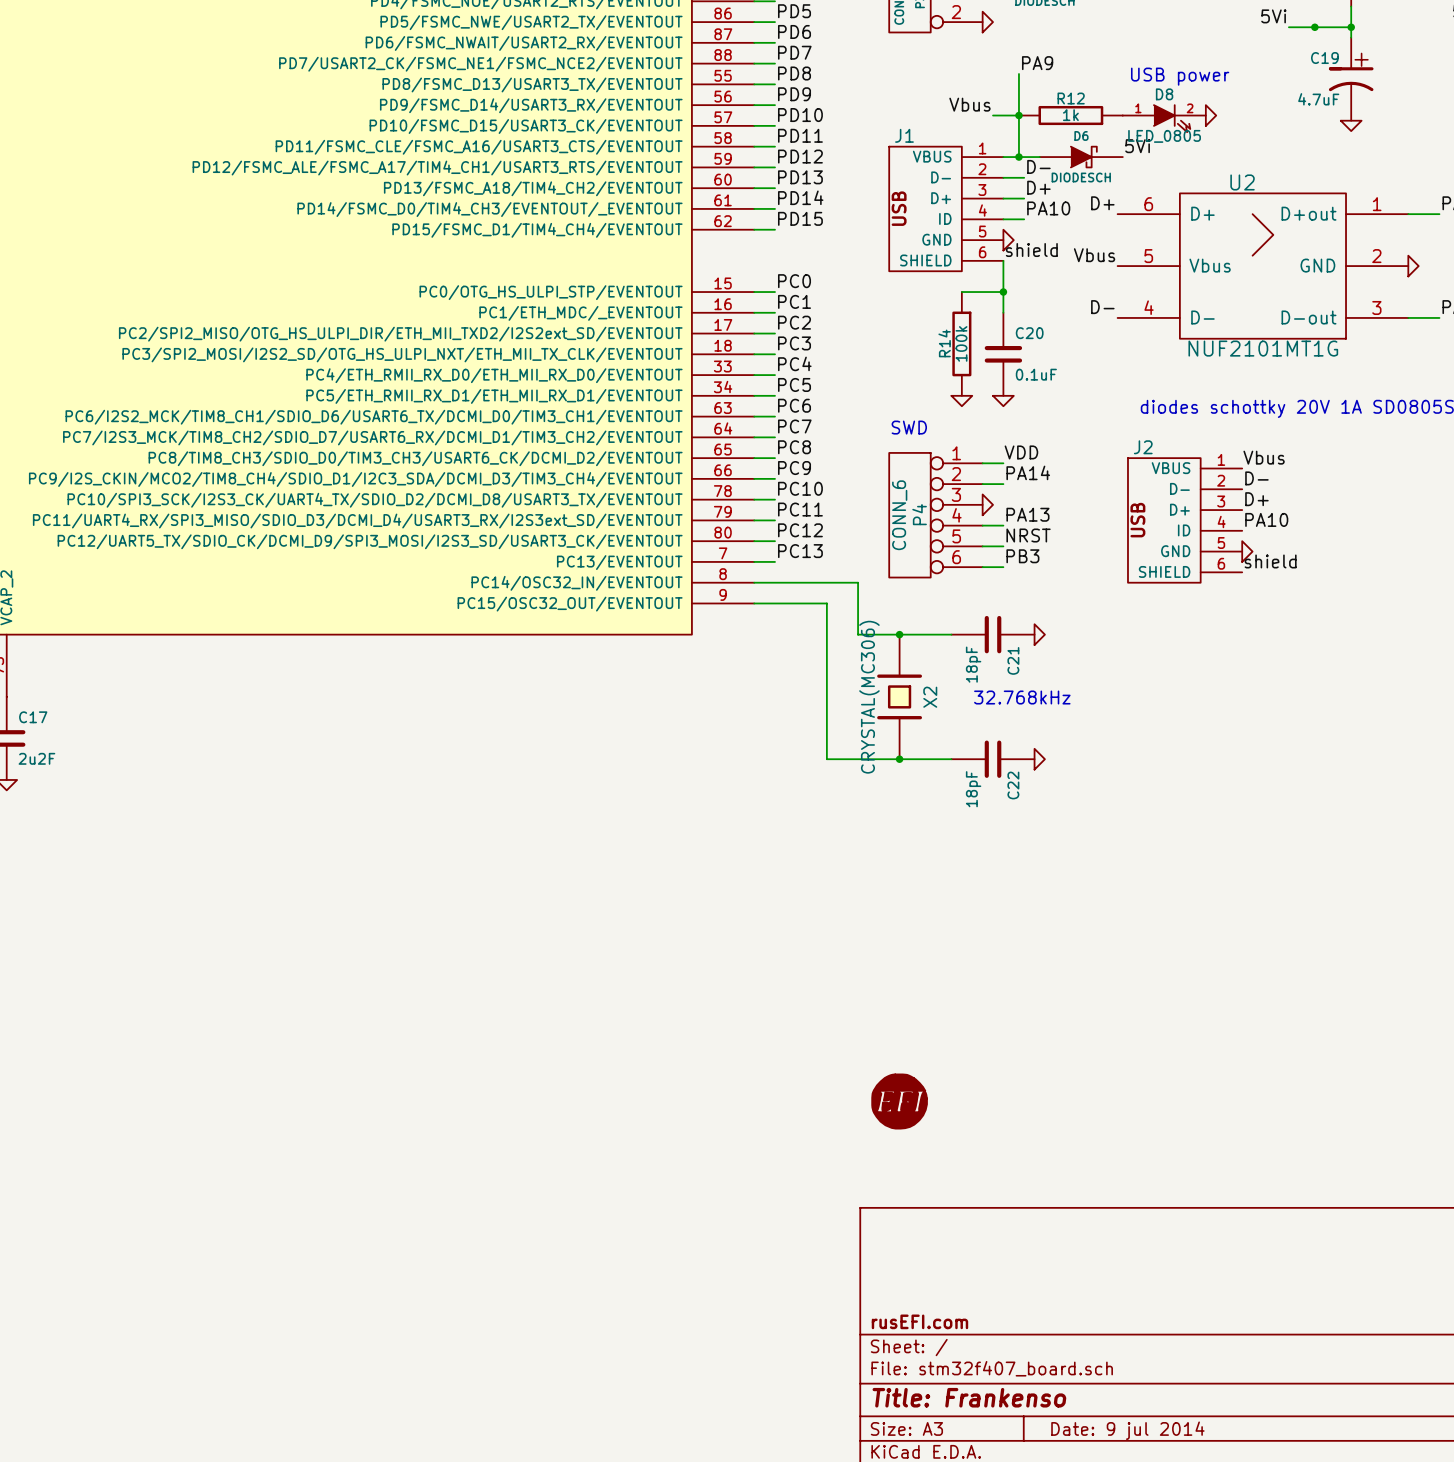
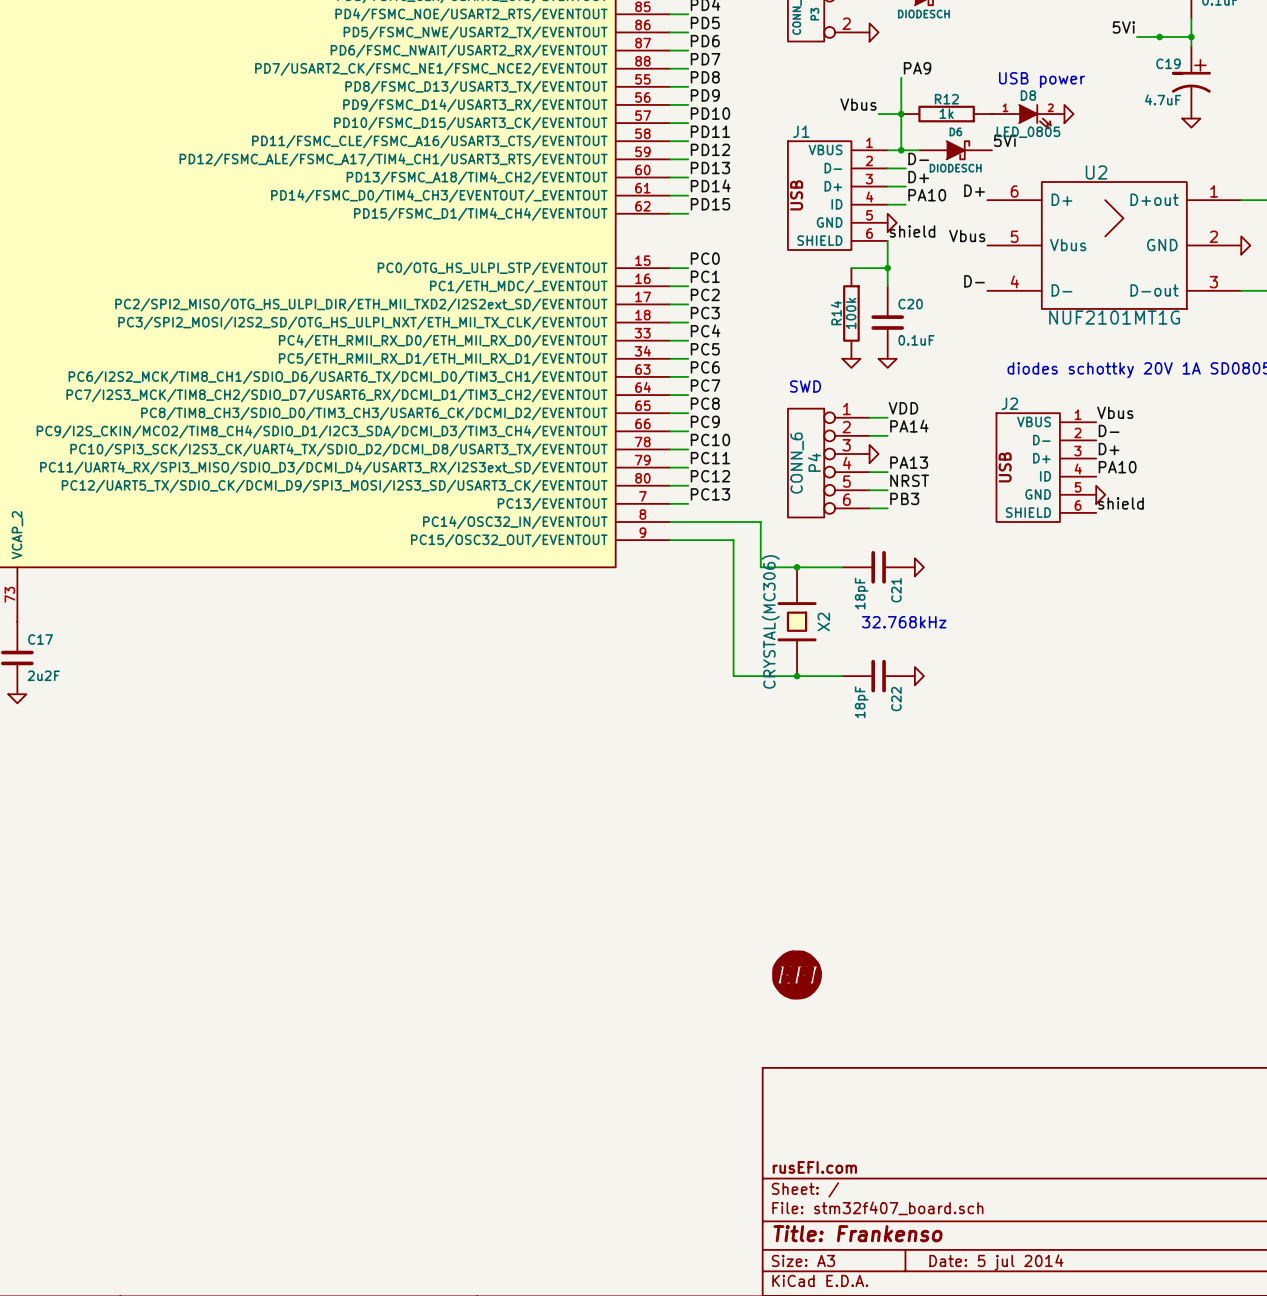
title block: Date: 9 jul 2014 (1127, 1430) -> Date: 5 jul 2014 (996, 1262)

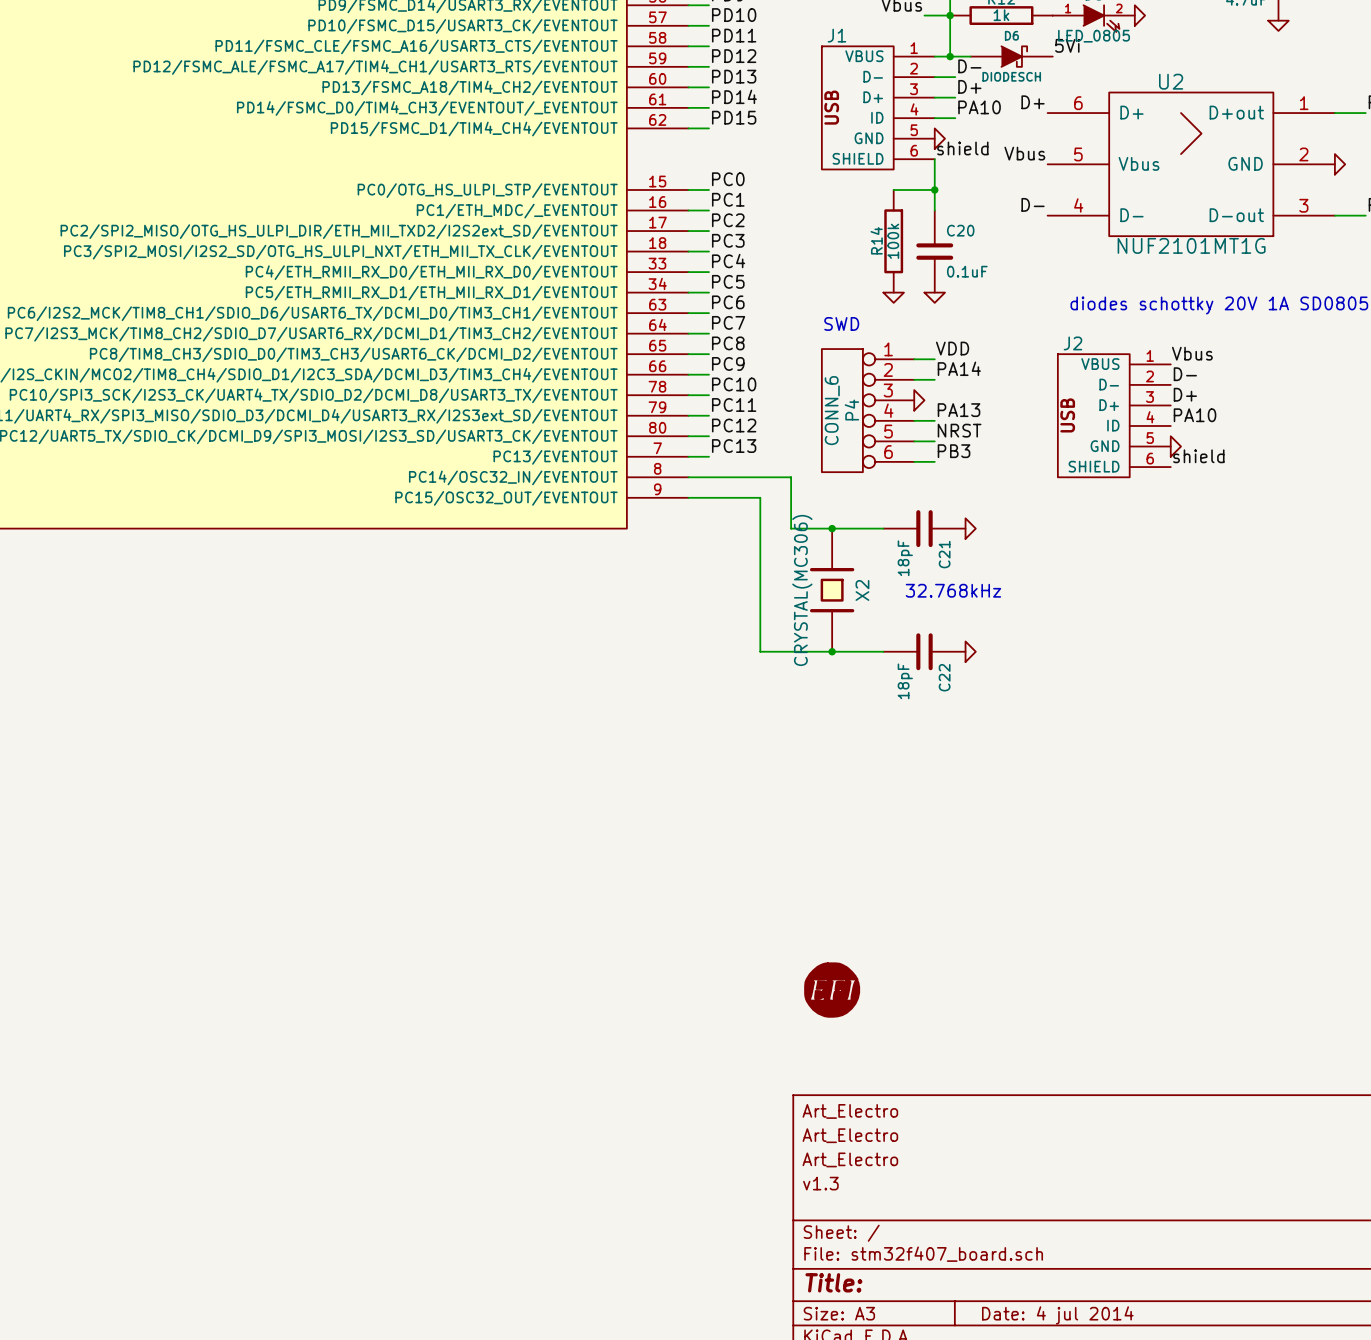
title block: none -> Art_Electro (850, 1111)
title block: none -> Art_Electro (850, 1135)
title block: none -> Art_Electro (850, 1159)
title block: none -> v1.3 (820, 1183)
title block: rusEFI.com (814, 1167) -> none
title block: Title: Frankenso (858, 1233) -> Title: (833, 1282)
title block: Date: 5 jul 2014 (996, 1262) -> Date: 4 jul 2014 (1057, 1315)

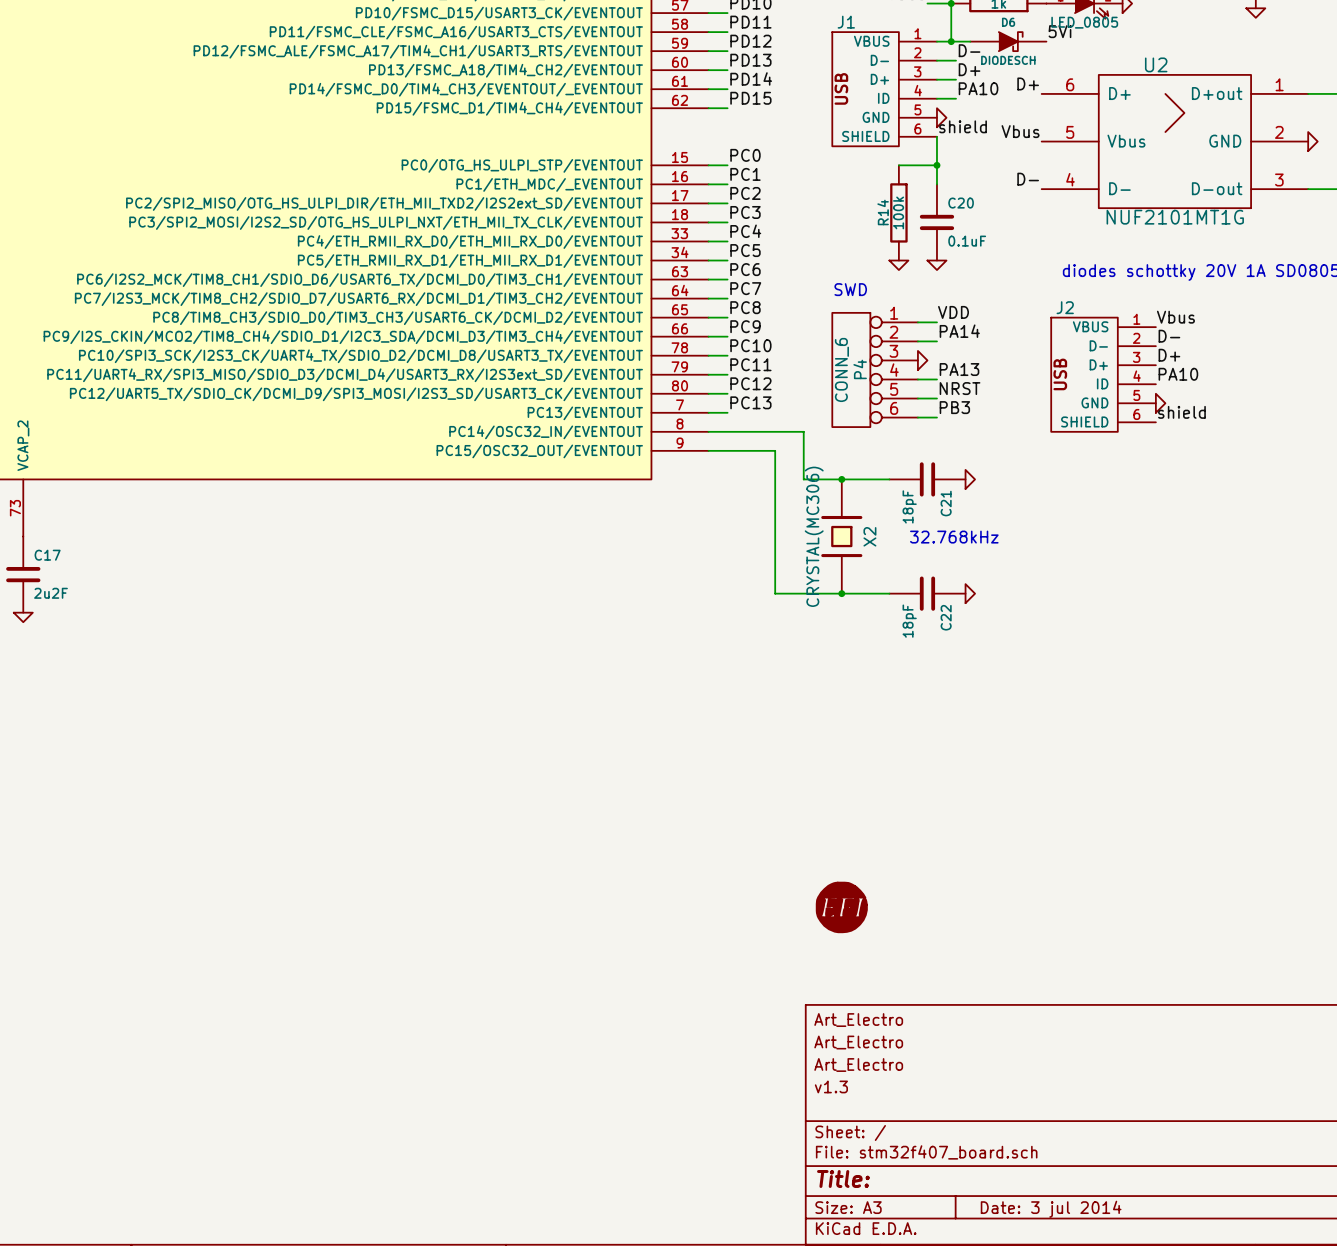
title block: Date: 4 jul 2014 (1057, 1315) -> Date: 3 jul 2014 (1051, 1209)

